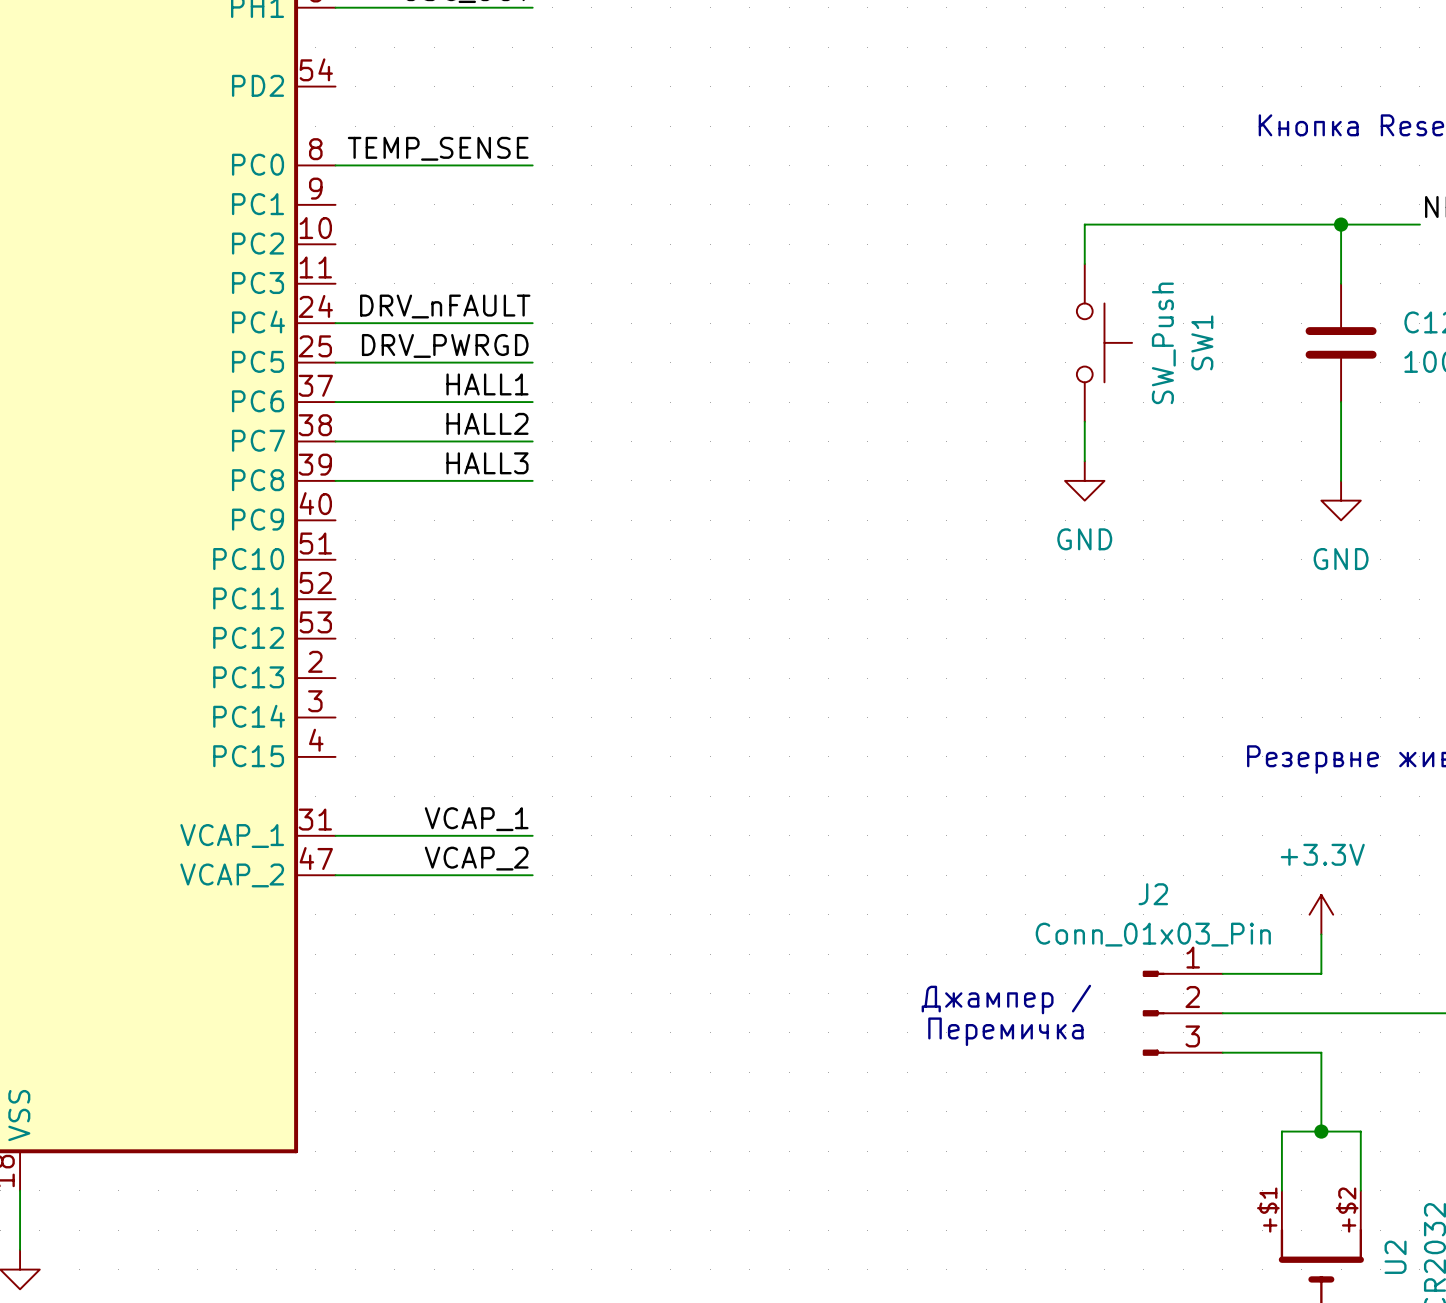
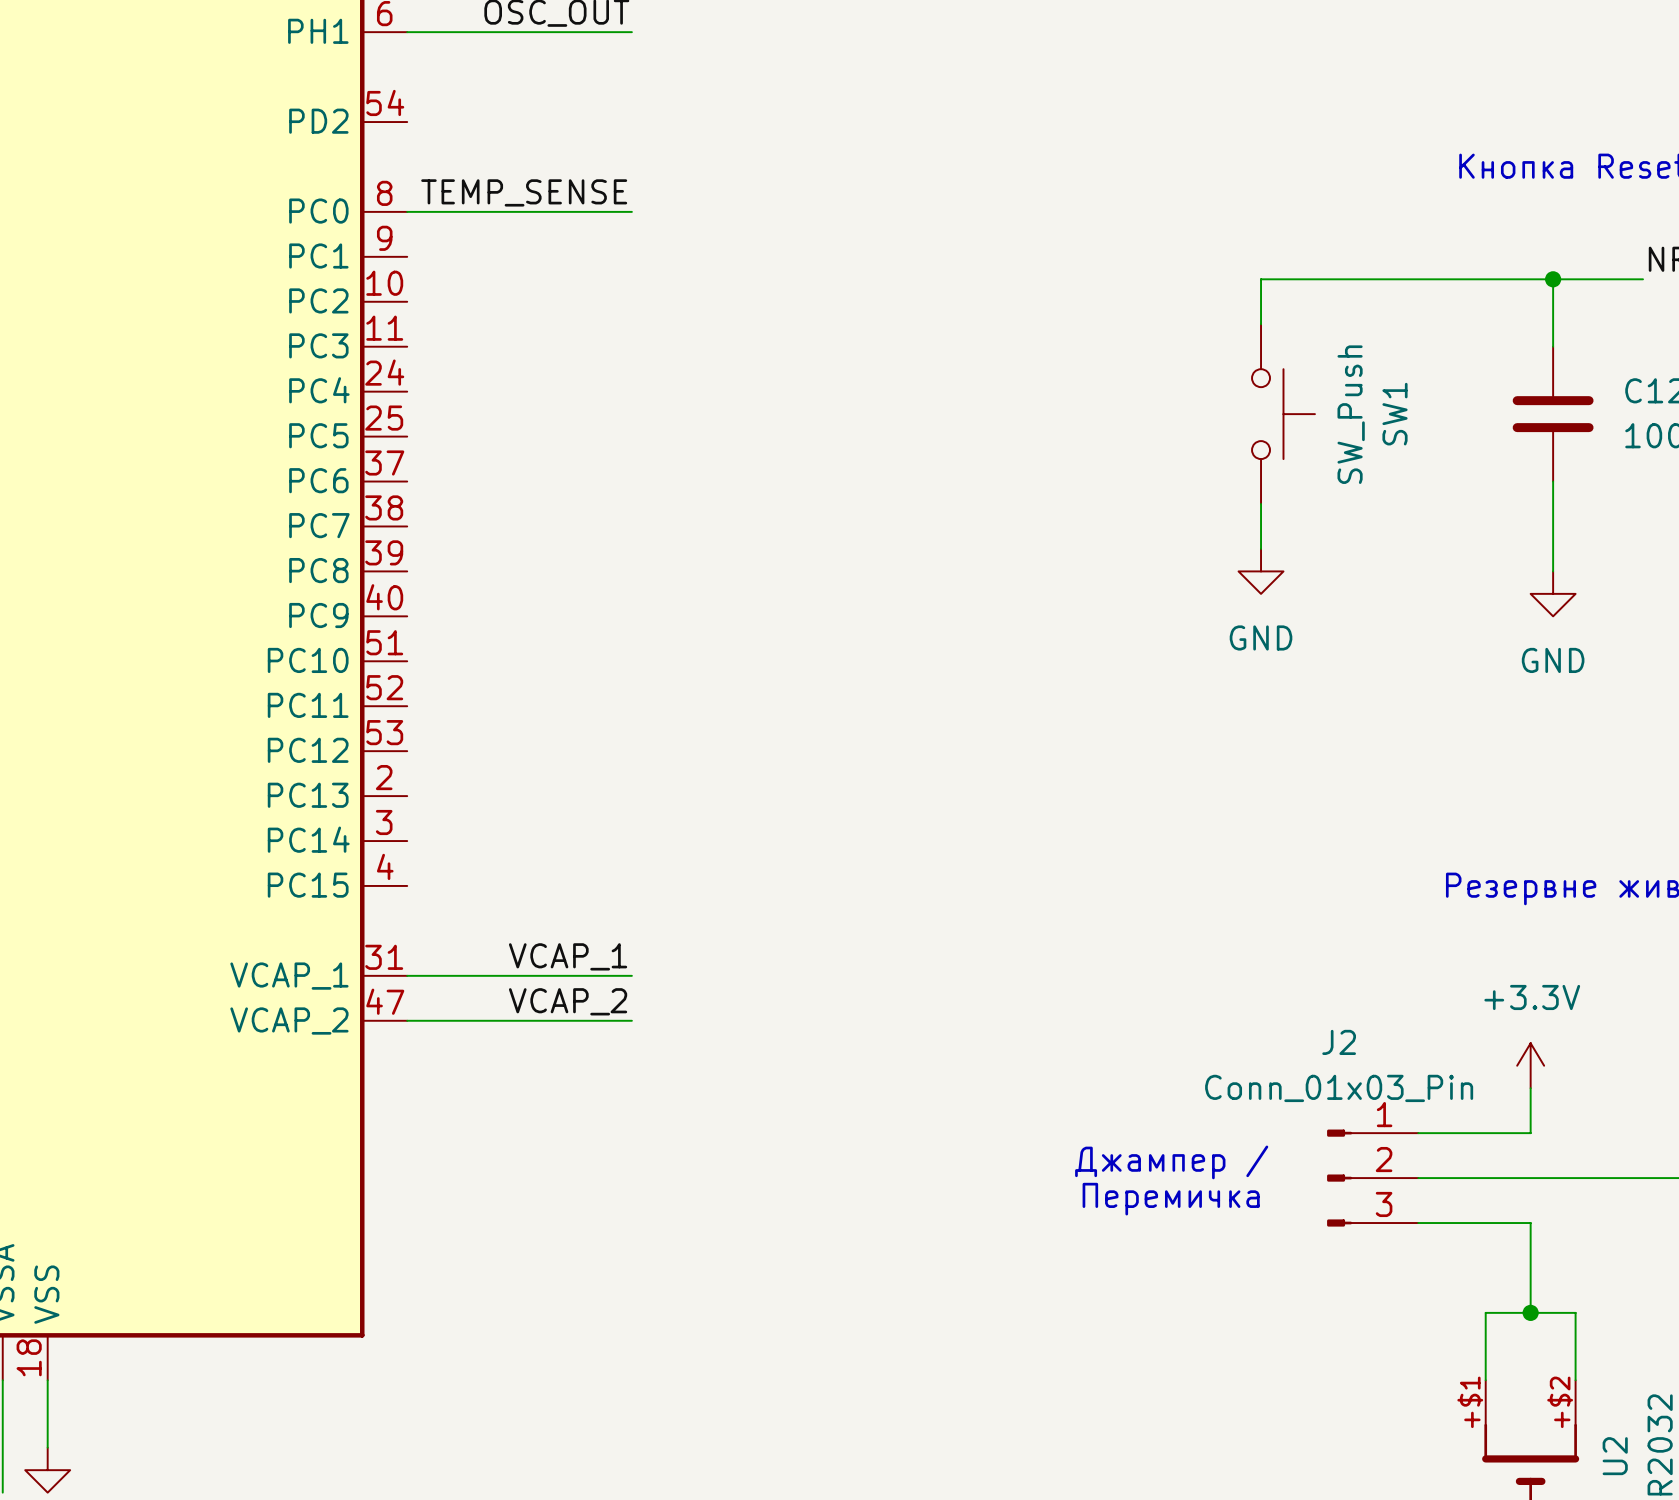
label: DRV_nFAULT (445, 306) -> none
wire: (335, 323) (532, 323) -> none
label: DRV_PWRGD (445, 345) -> none
wire: (335, 362) (532, 362) -> none
label: HALL1 (487, 384) -> none
wire: (335, 402) (532, 402) -> none
label: HALL2 (487, 423) -> none
wire: (335, 441) (532, 441) -> none
label: HALL3 (487, 463) -> none
wire: (335, 480) (532, 480) -> none

